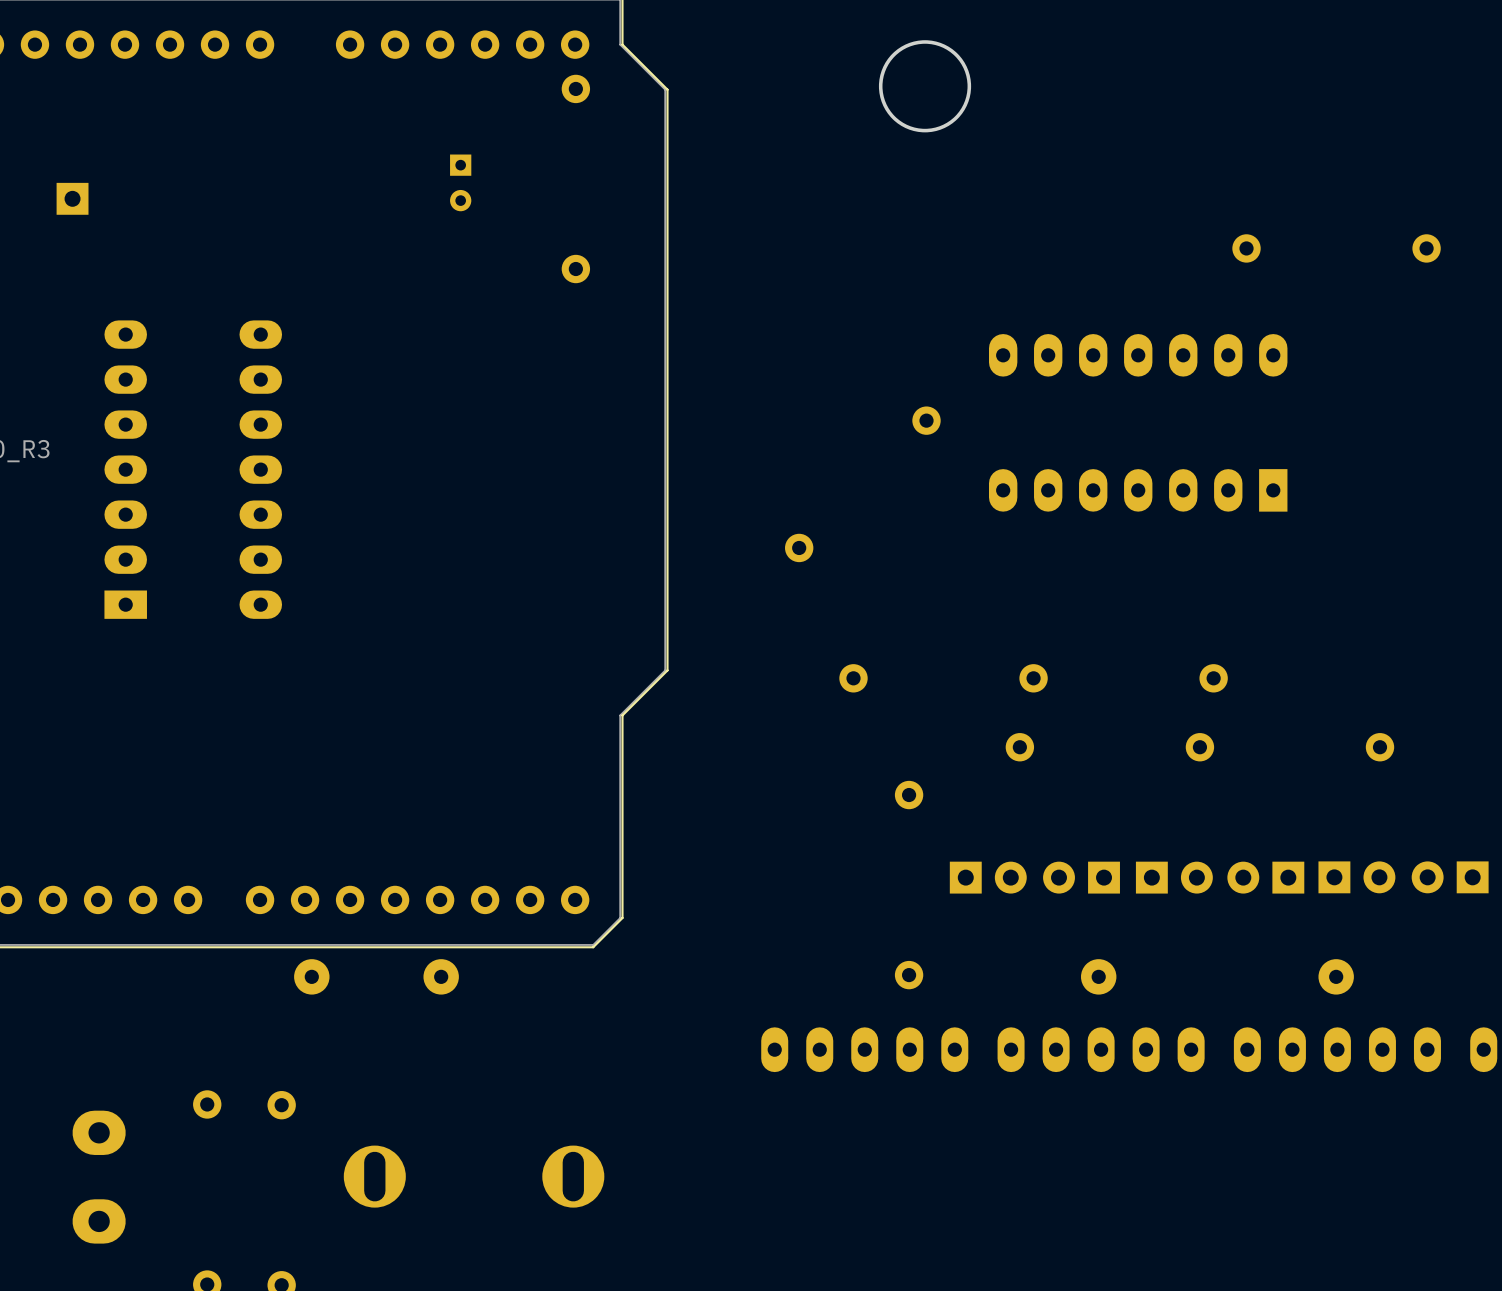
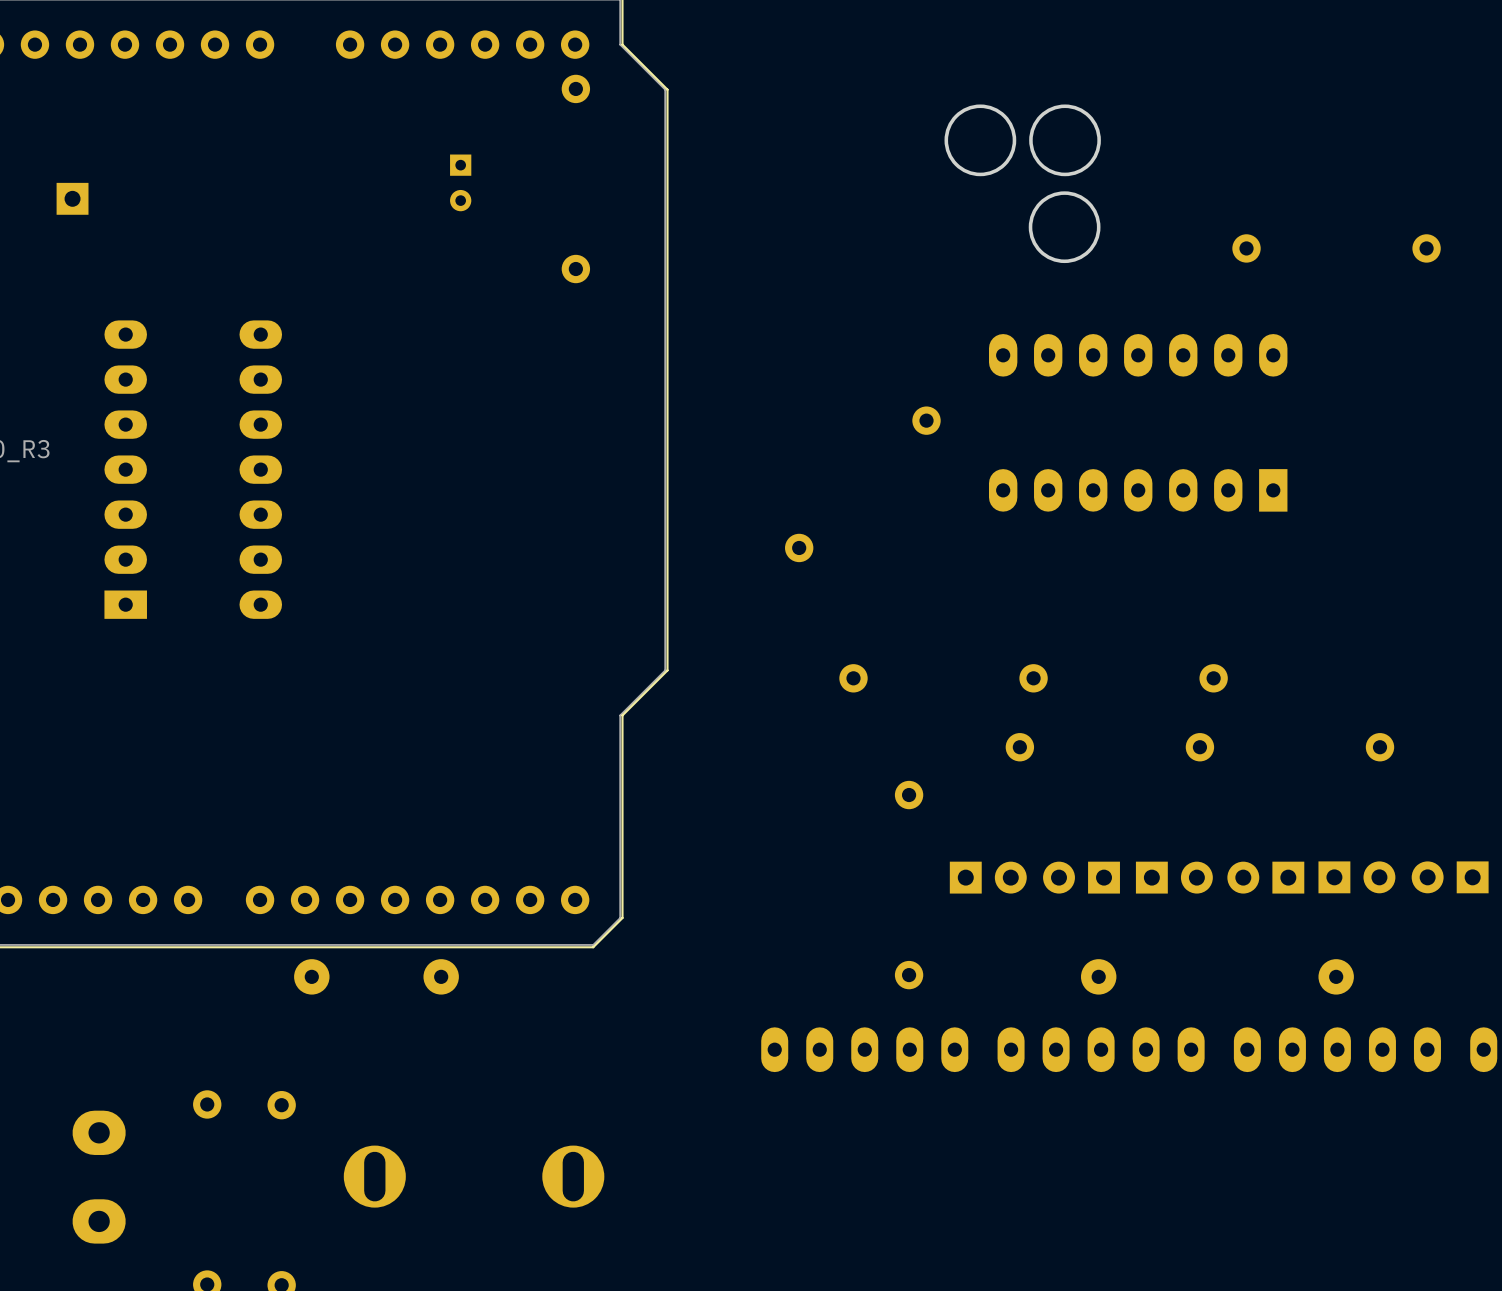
round board edge: [878, 40, 972, 133] -> none
round board edge: none -> [944, 104, 1017, 177]
round board edge: none -> [1029, 104, 1101, 177]
round board edge: none -> [1028, 191, 1101, 264]

